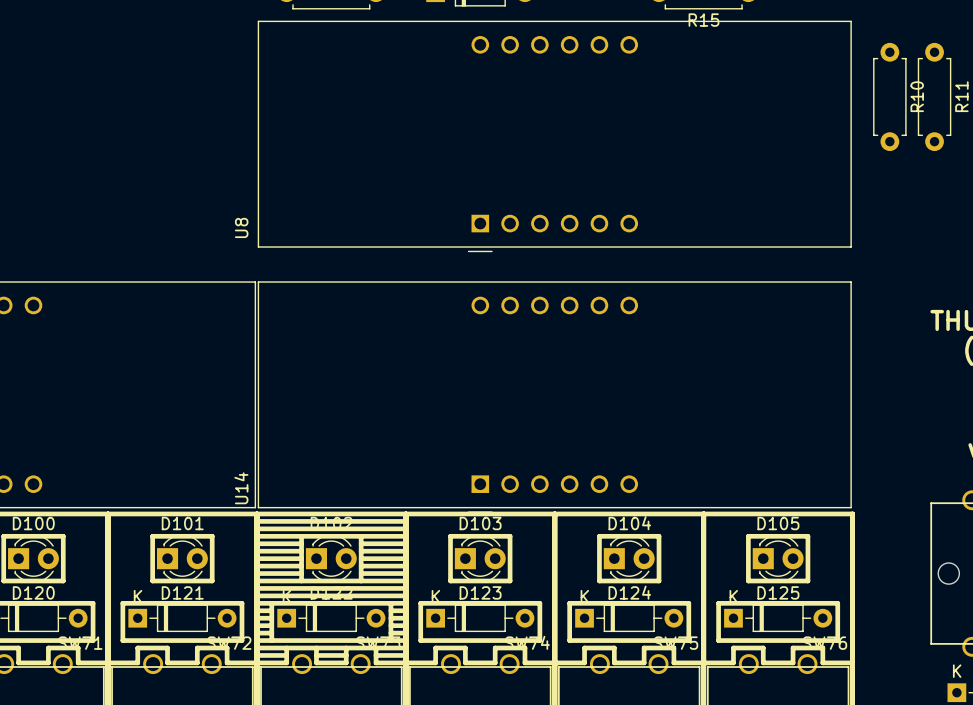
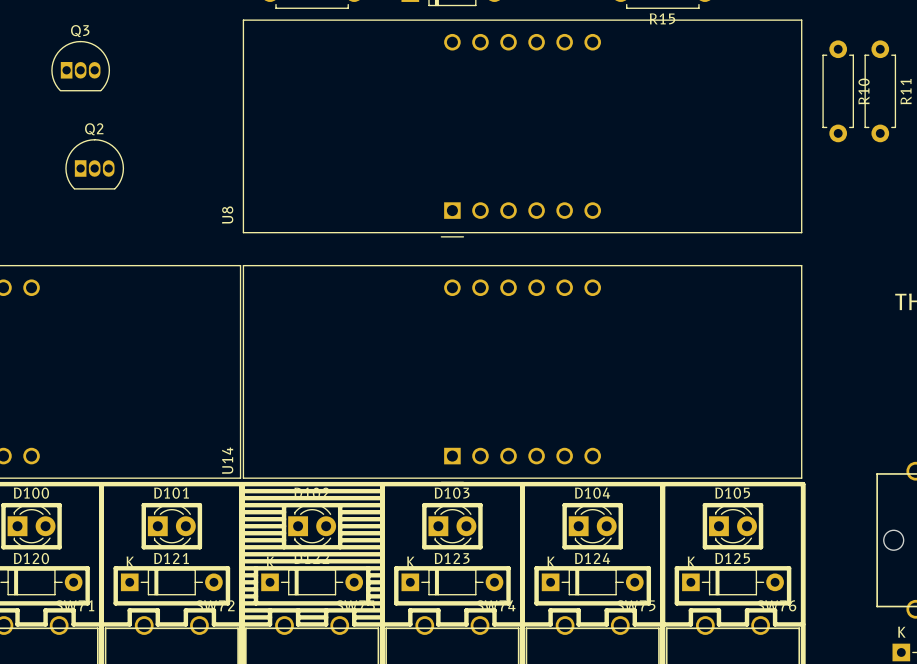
Q3: none -> (80, 66)
Q2: none -> (94, 164)

